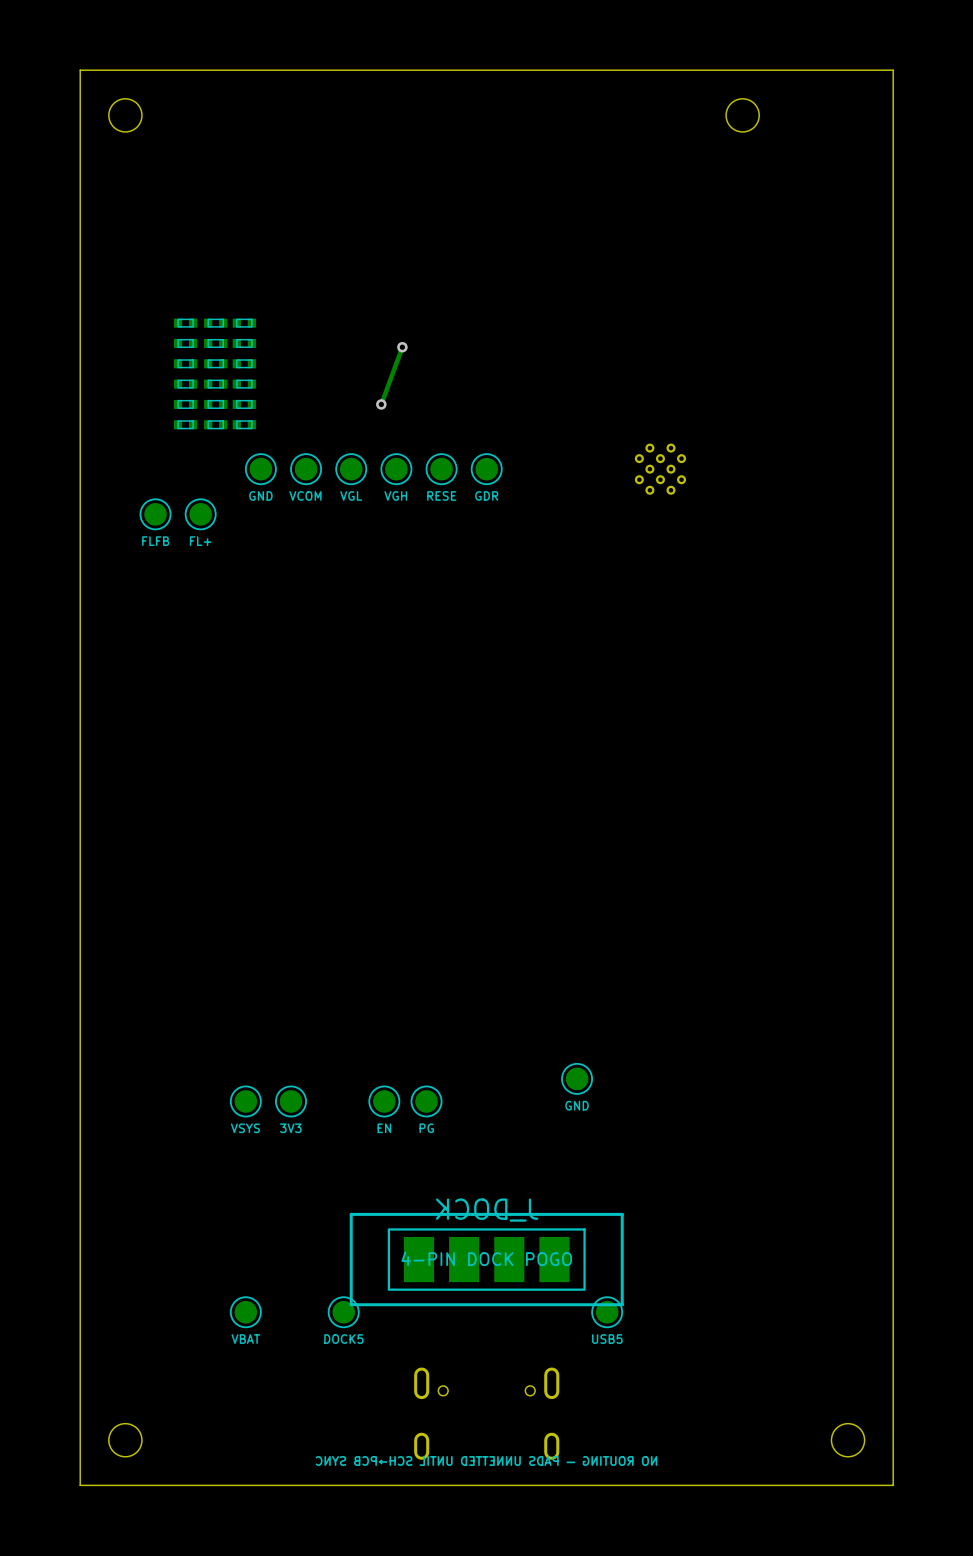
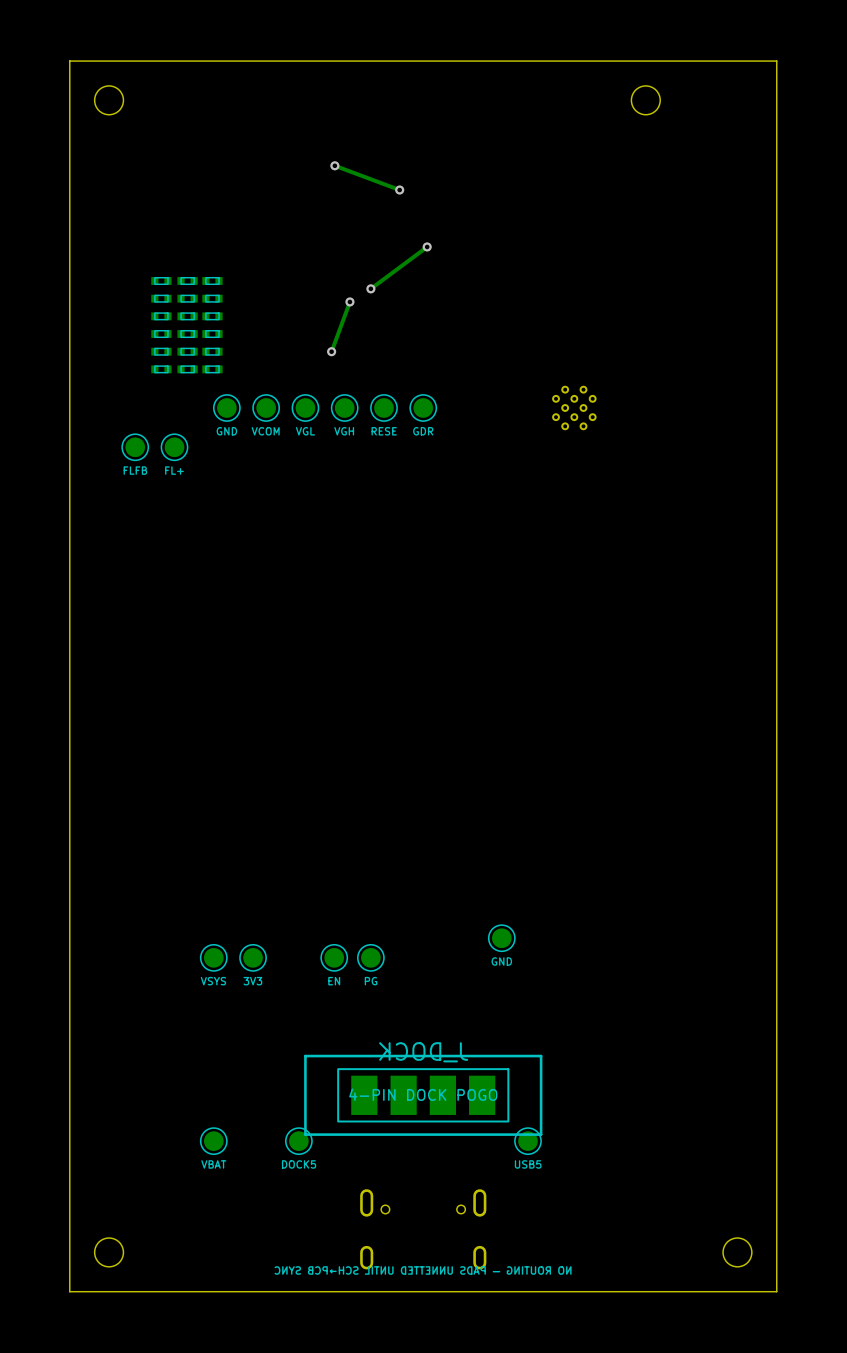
track: none -> (334, 165) (399, 190)
via: none -> (334, 165)
via: none -> (399, 190)
track: none -> (427, 246) (370, 288)
via: none -> (427, 246)
via: none -> (370, 288)

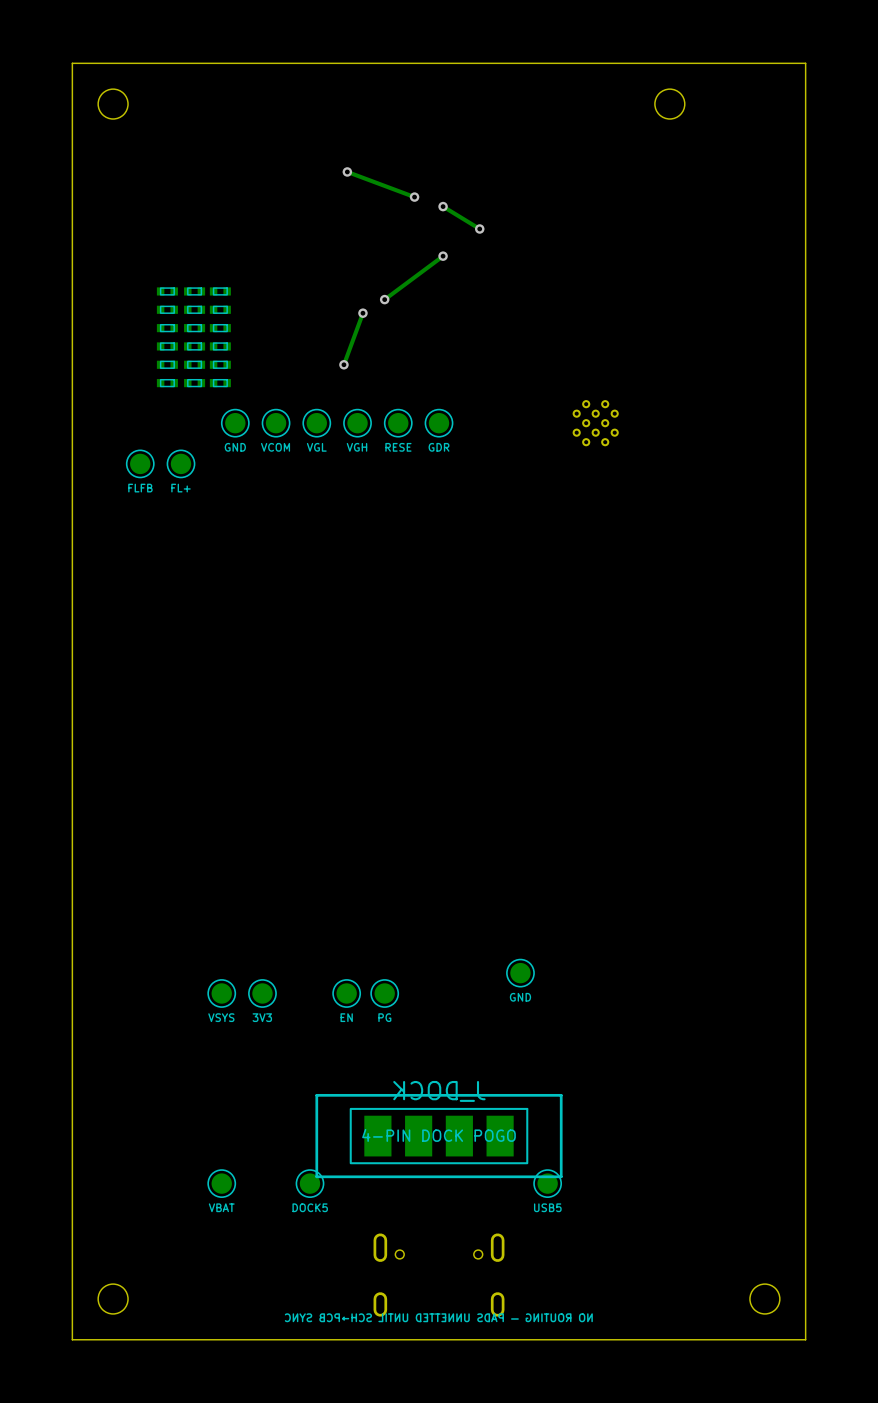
track: none -> (443, 206) (479, 228)
via: none -> (443, 206)
via: none -> (479, 228)

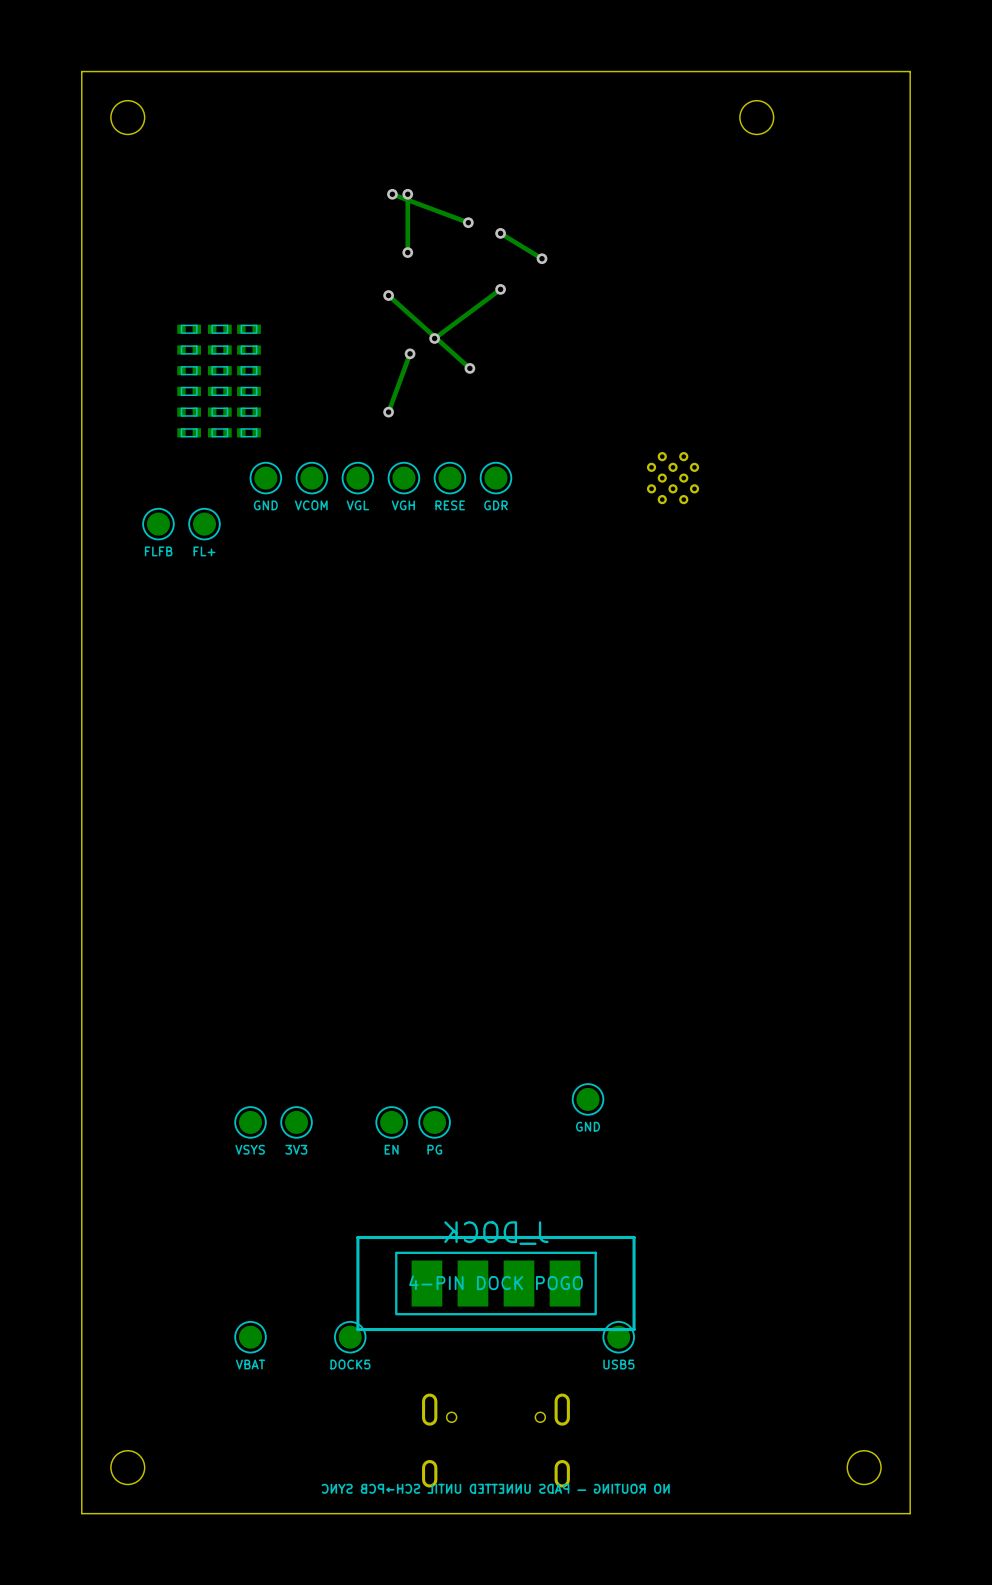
track: none -> (407, 194) (407, 252)
via: none -> (407, 194)
via: none -> (407, 252)
track: none -> (388, 295) (469, 368)
via: none -> (388, 295)
via: none -> (469, 368)

